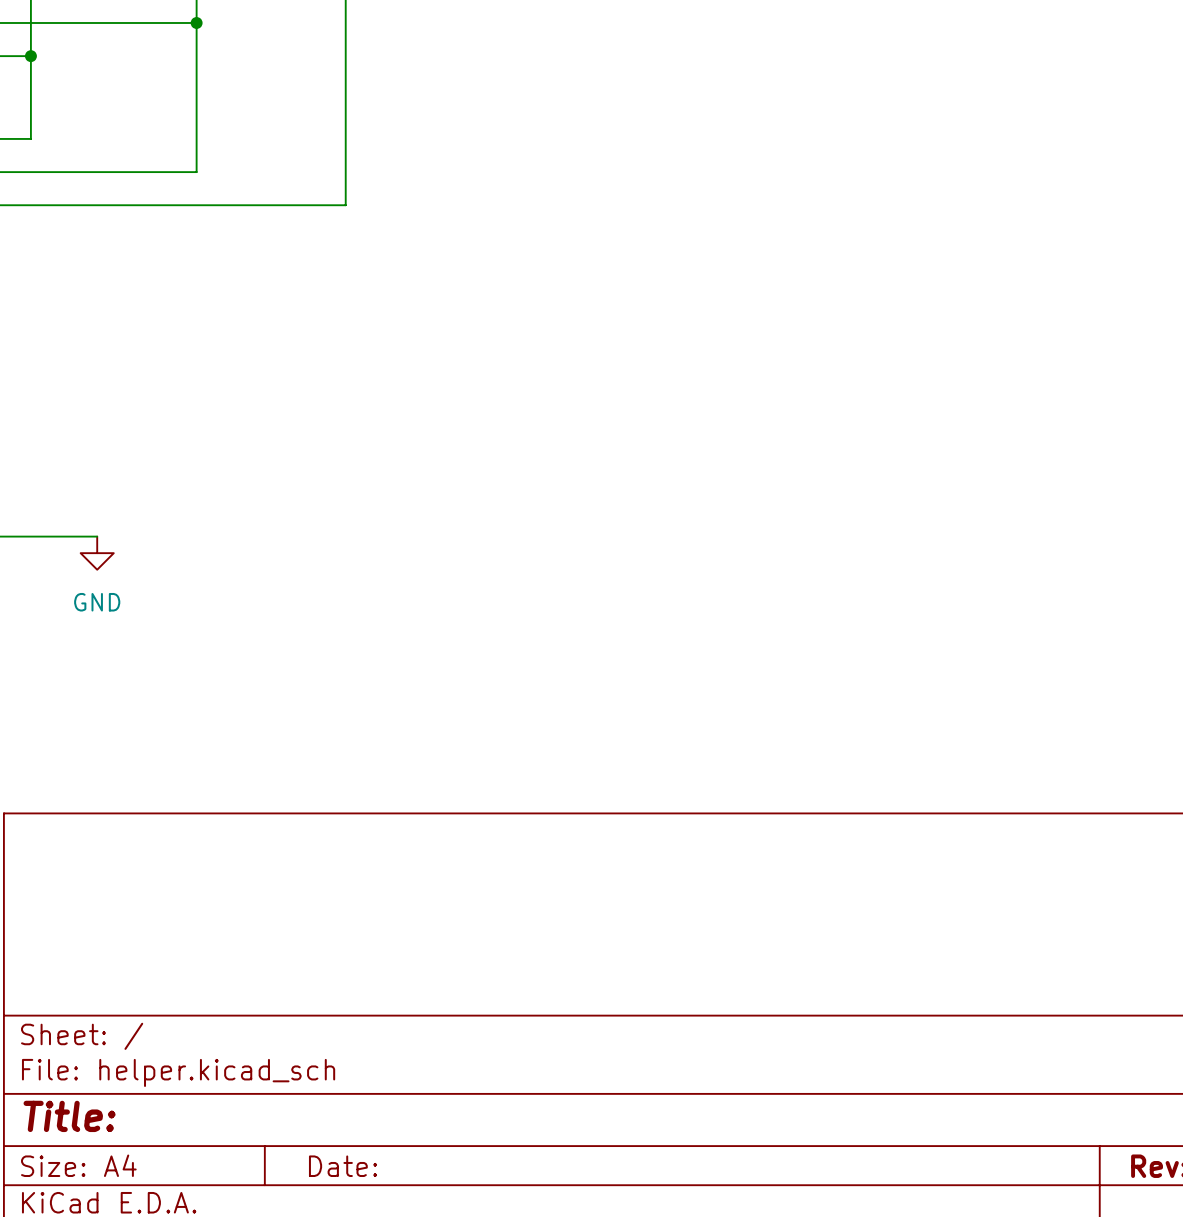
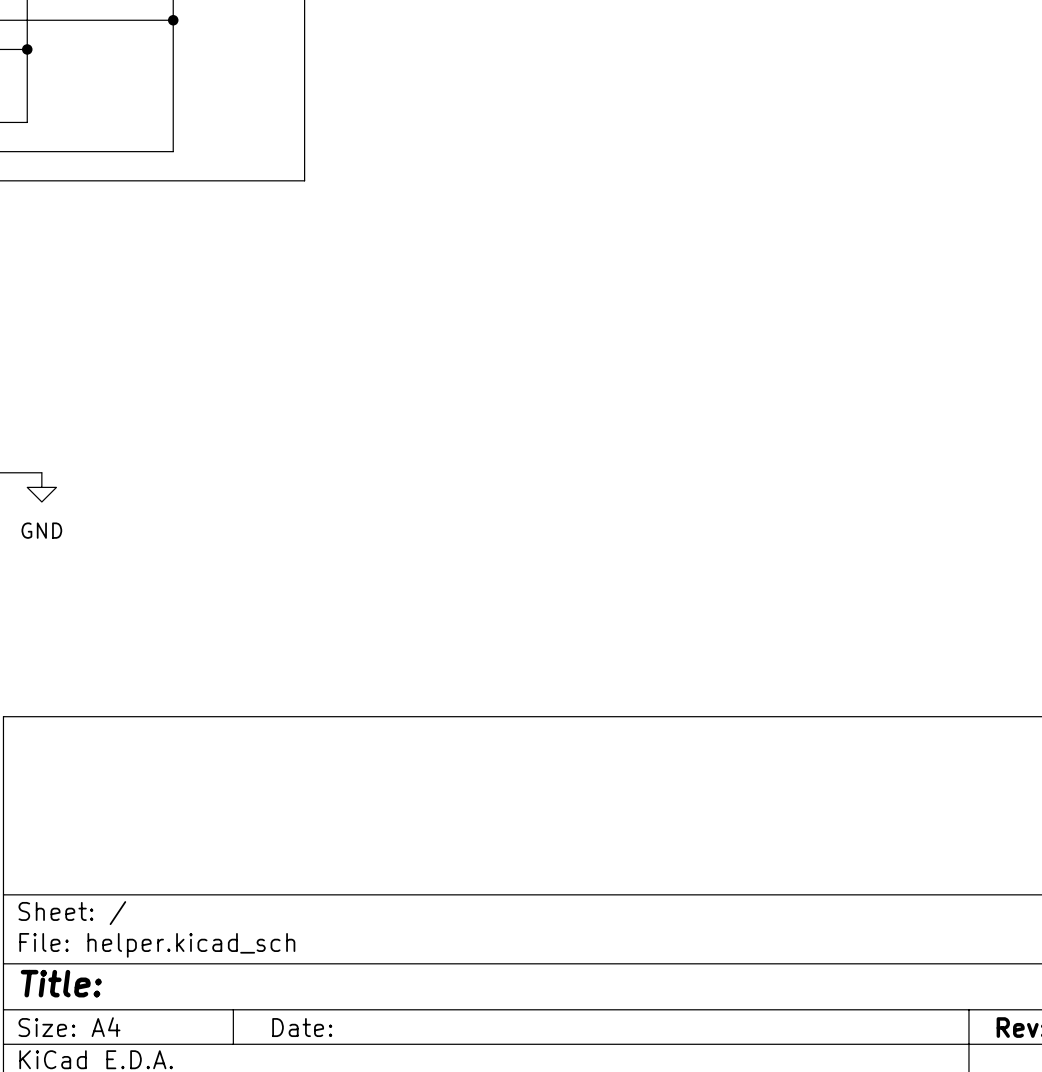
wire: (47, 536) (97, 536) -> none
power symbol position: GND (97, 553) -> GND (41, 487)

